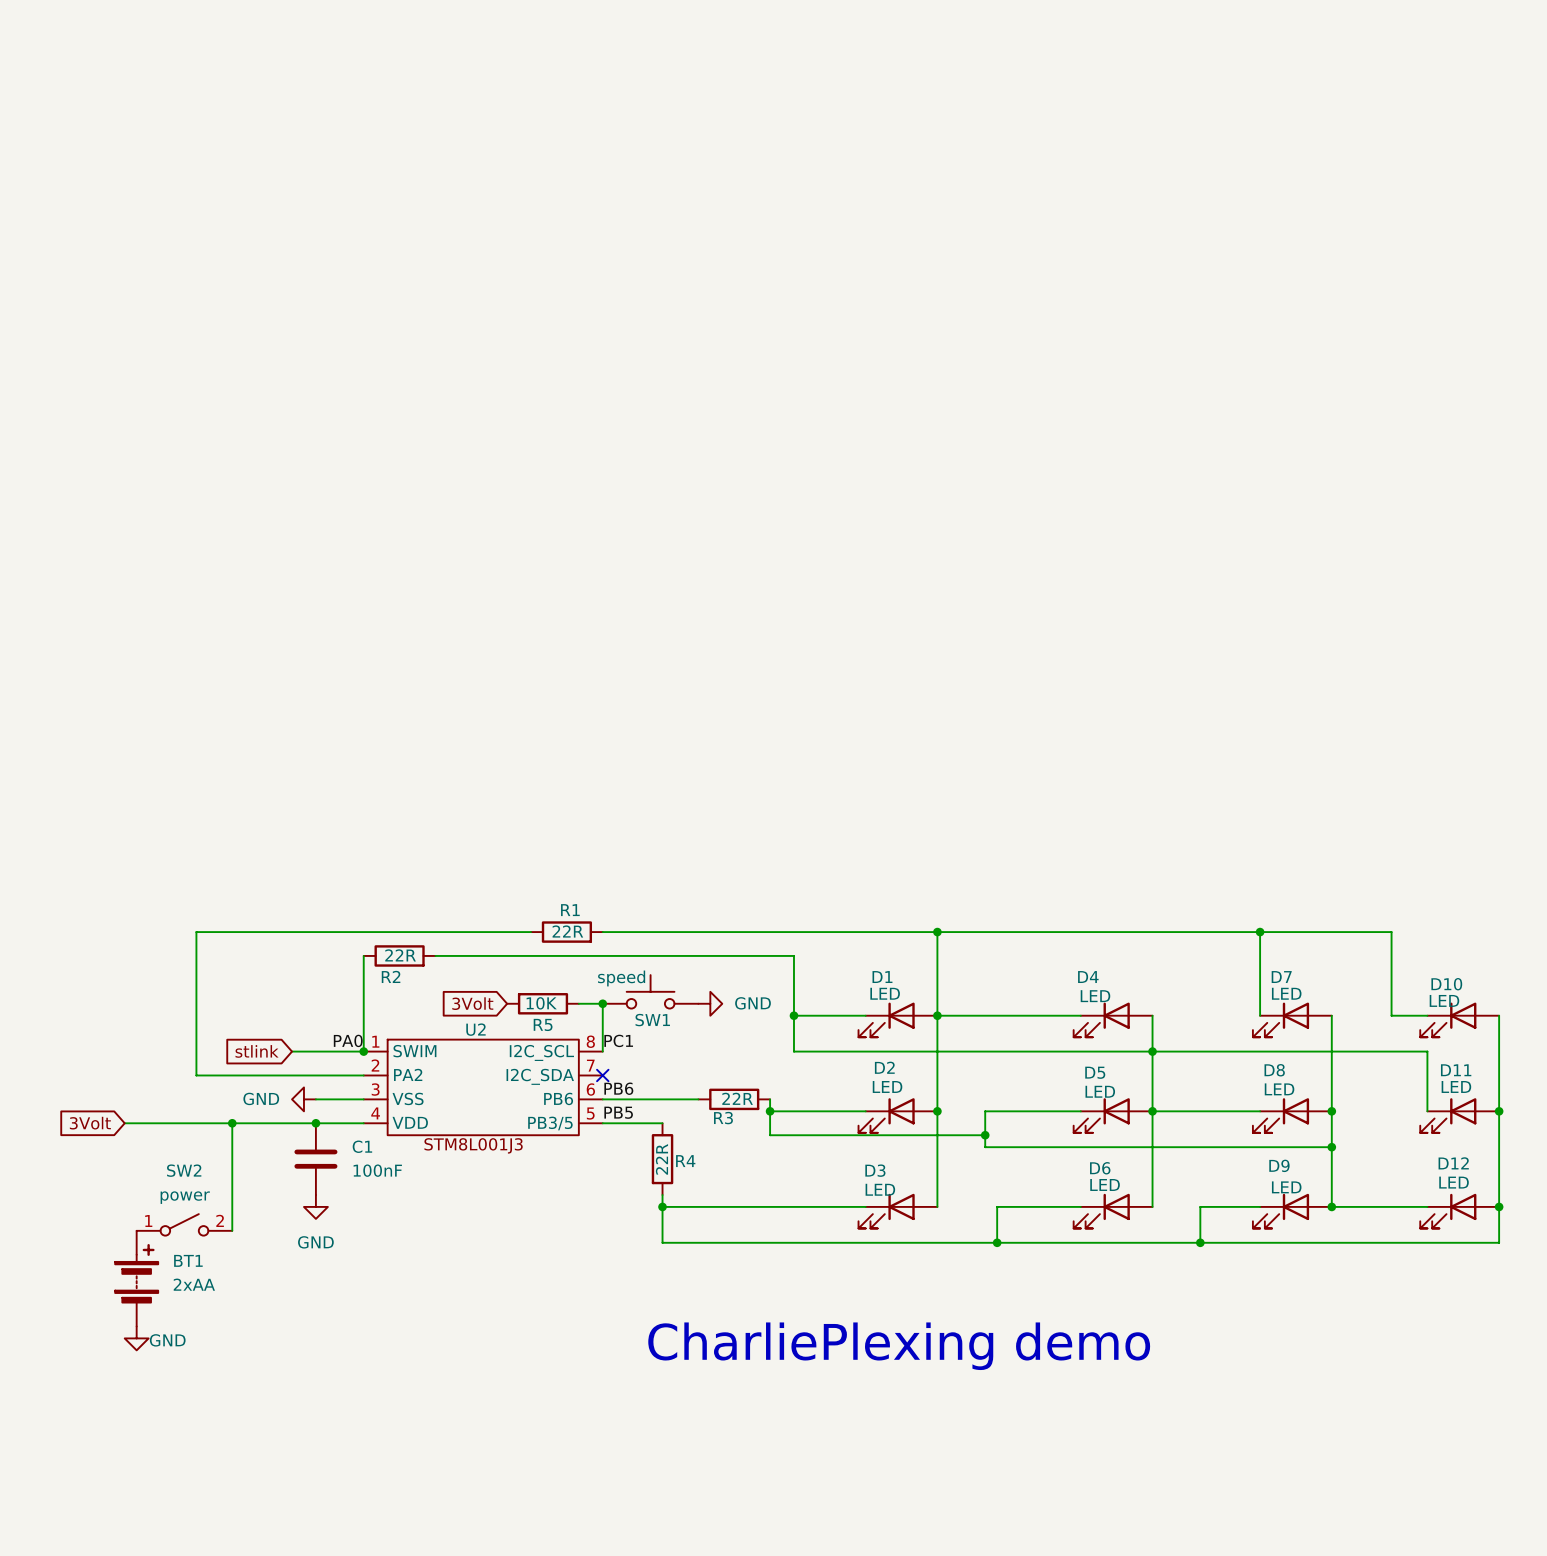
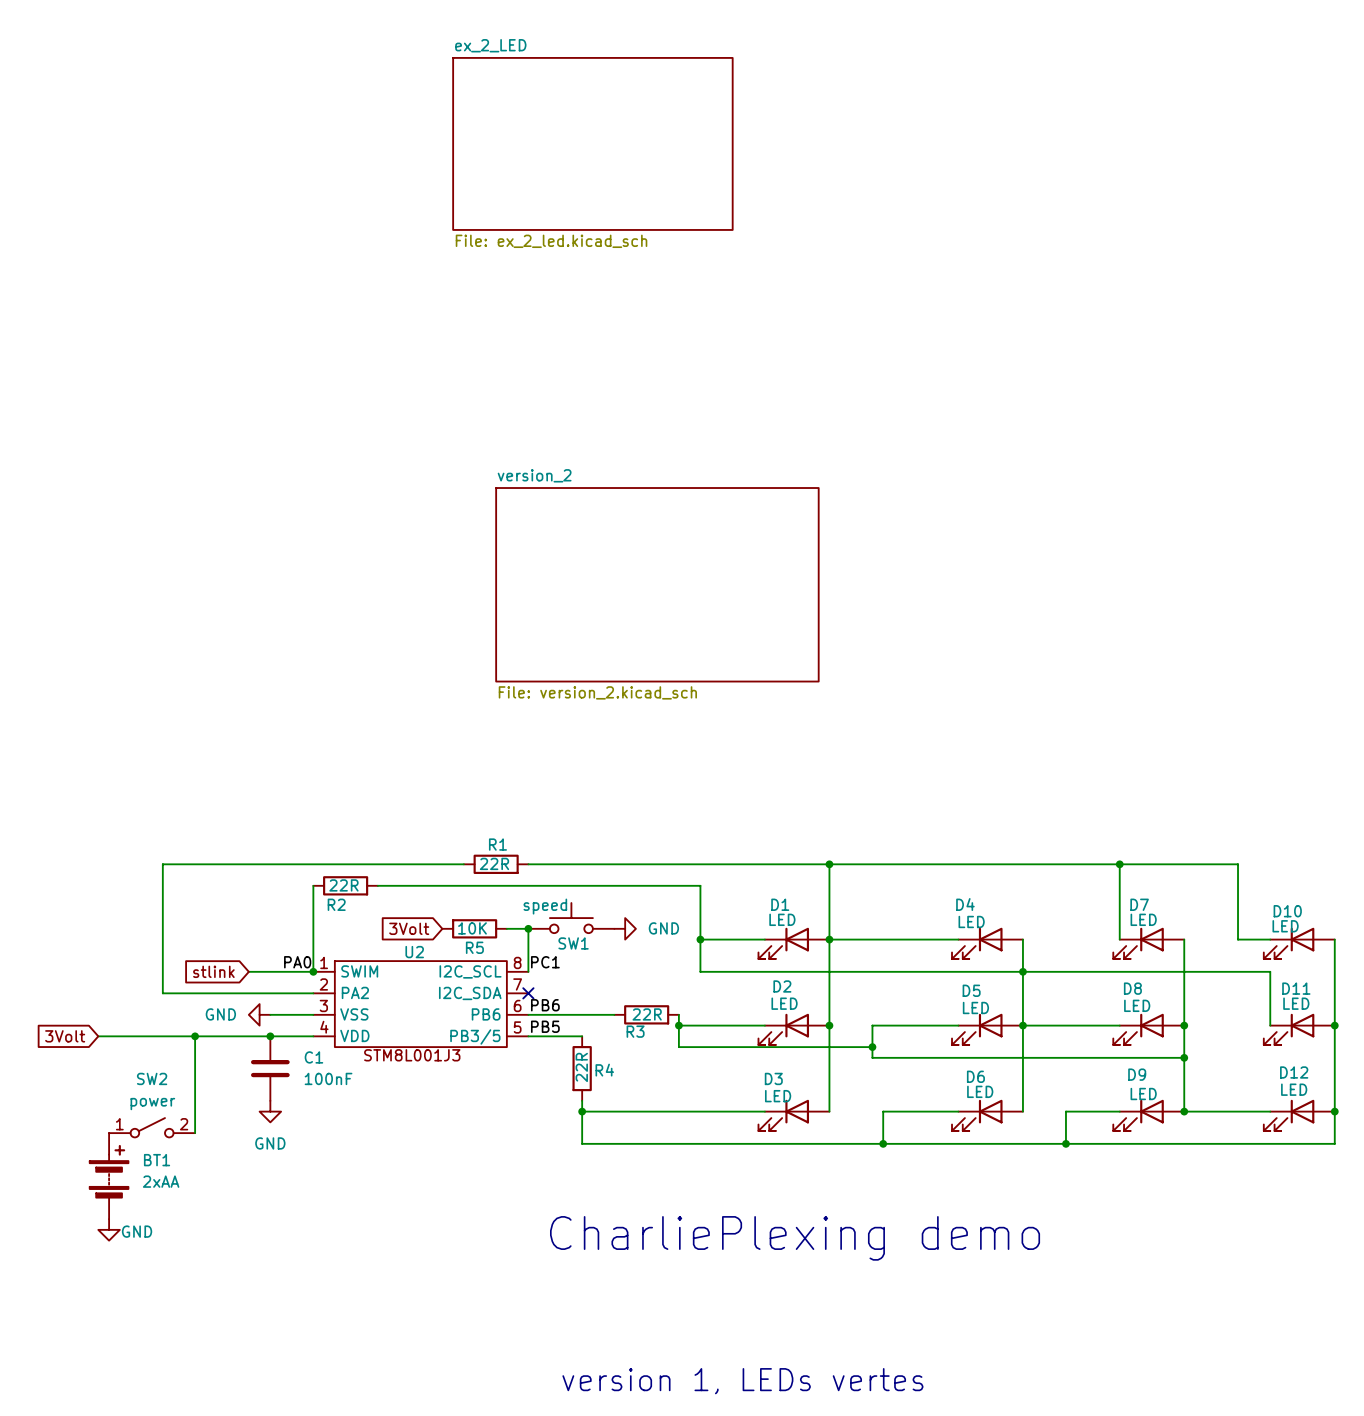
sheet ex_2_LED: none -> File: ex_2_led.kicad_sch (592, 143)
sheet version_2: none -> File: version_2.kicad_sch (657, 584)
text: none -> version 1, LEDs vertes (742, 1381)

